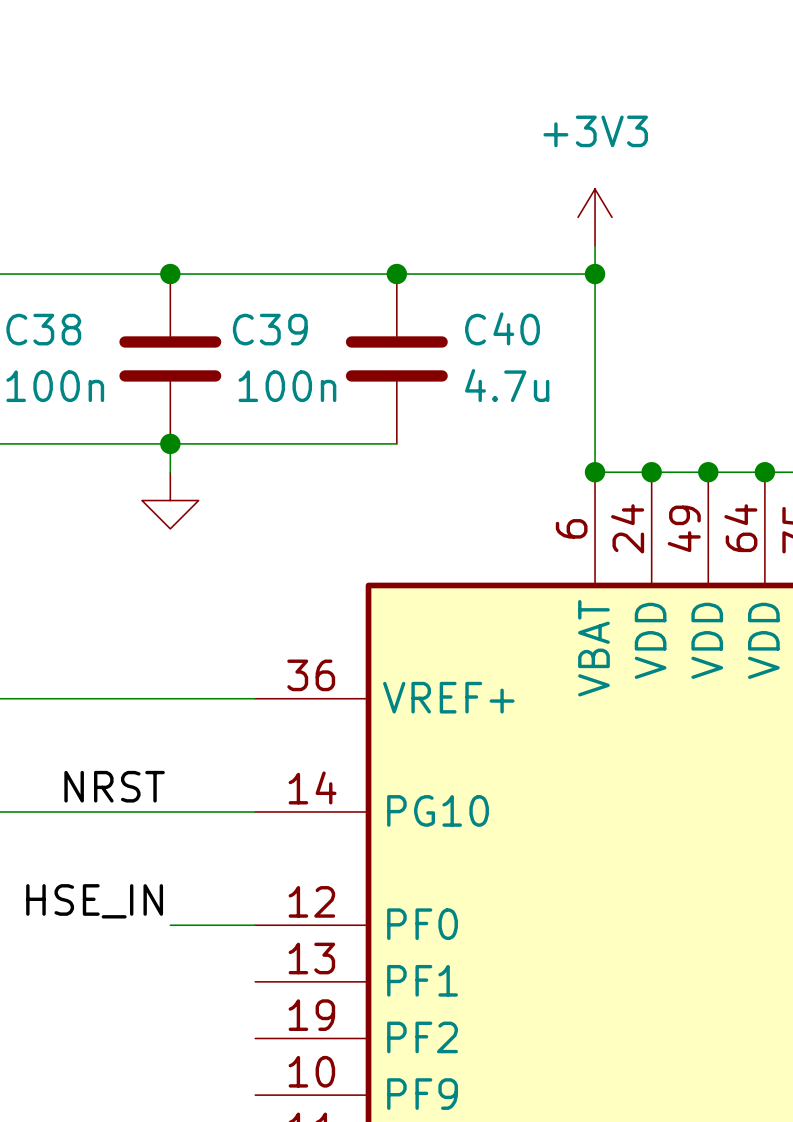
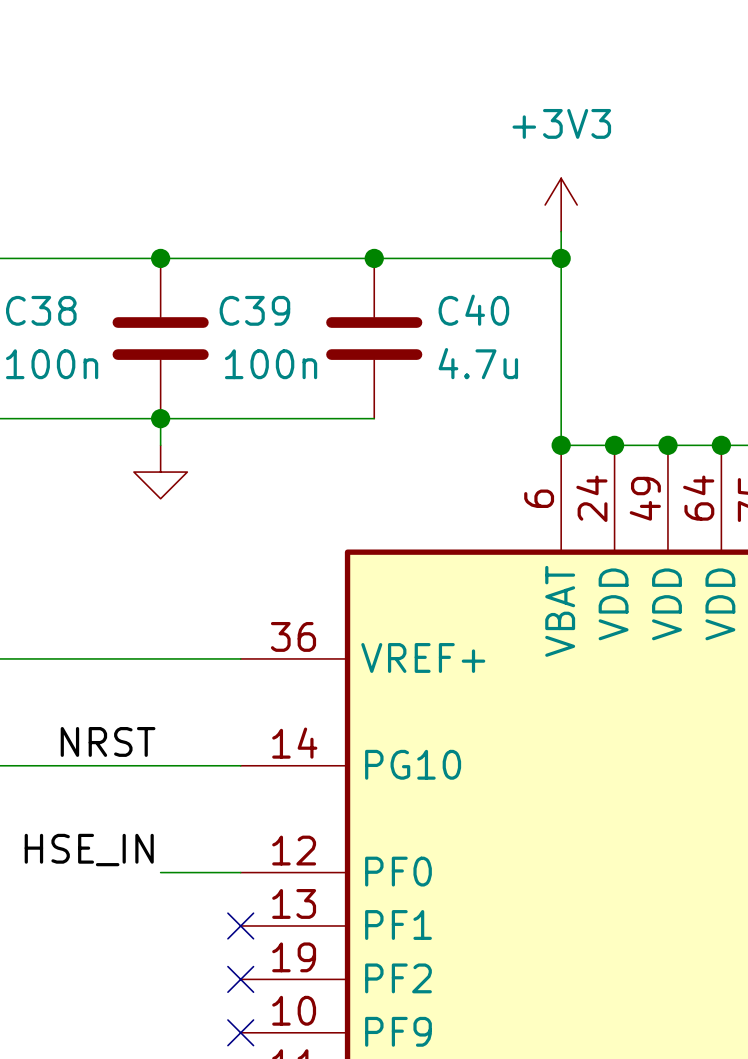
no-connect mark: none -> (240, 925)
no-connect mark: none -> (240, 979)
no-connect mark: none -> (240, 1032)

